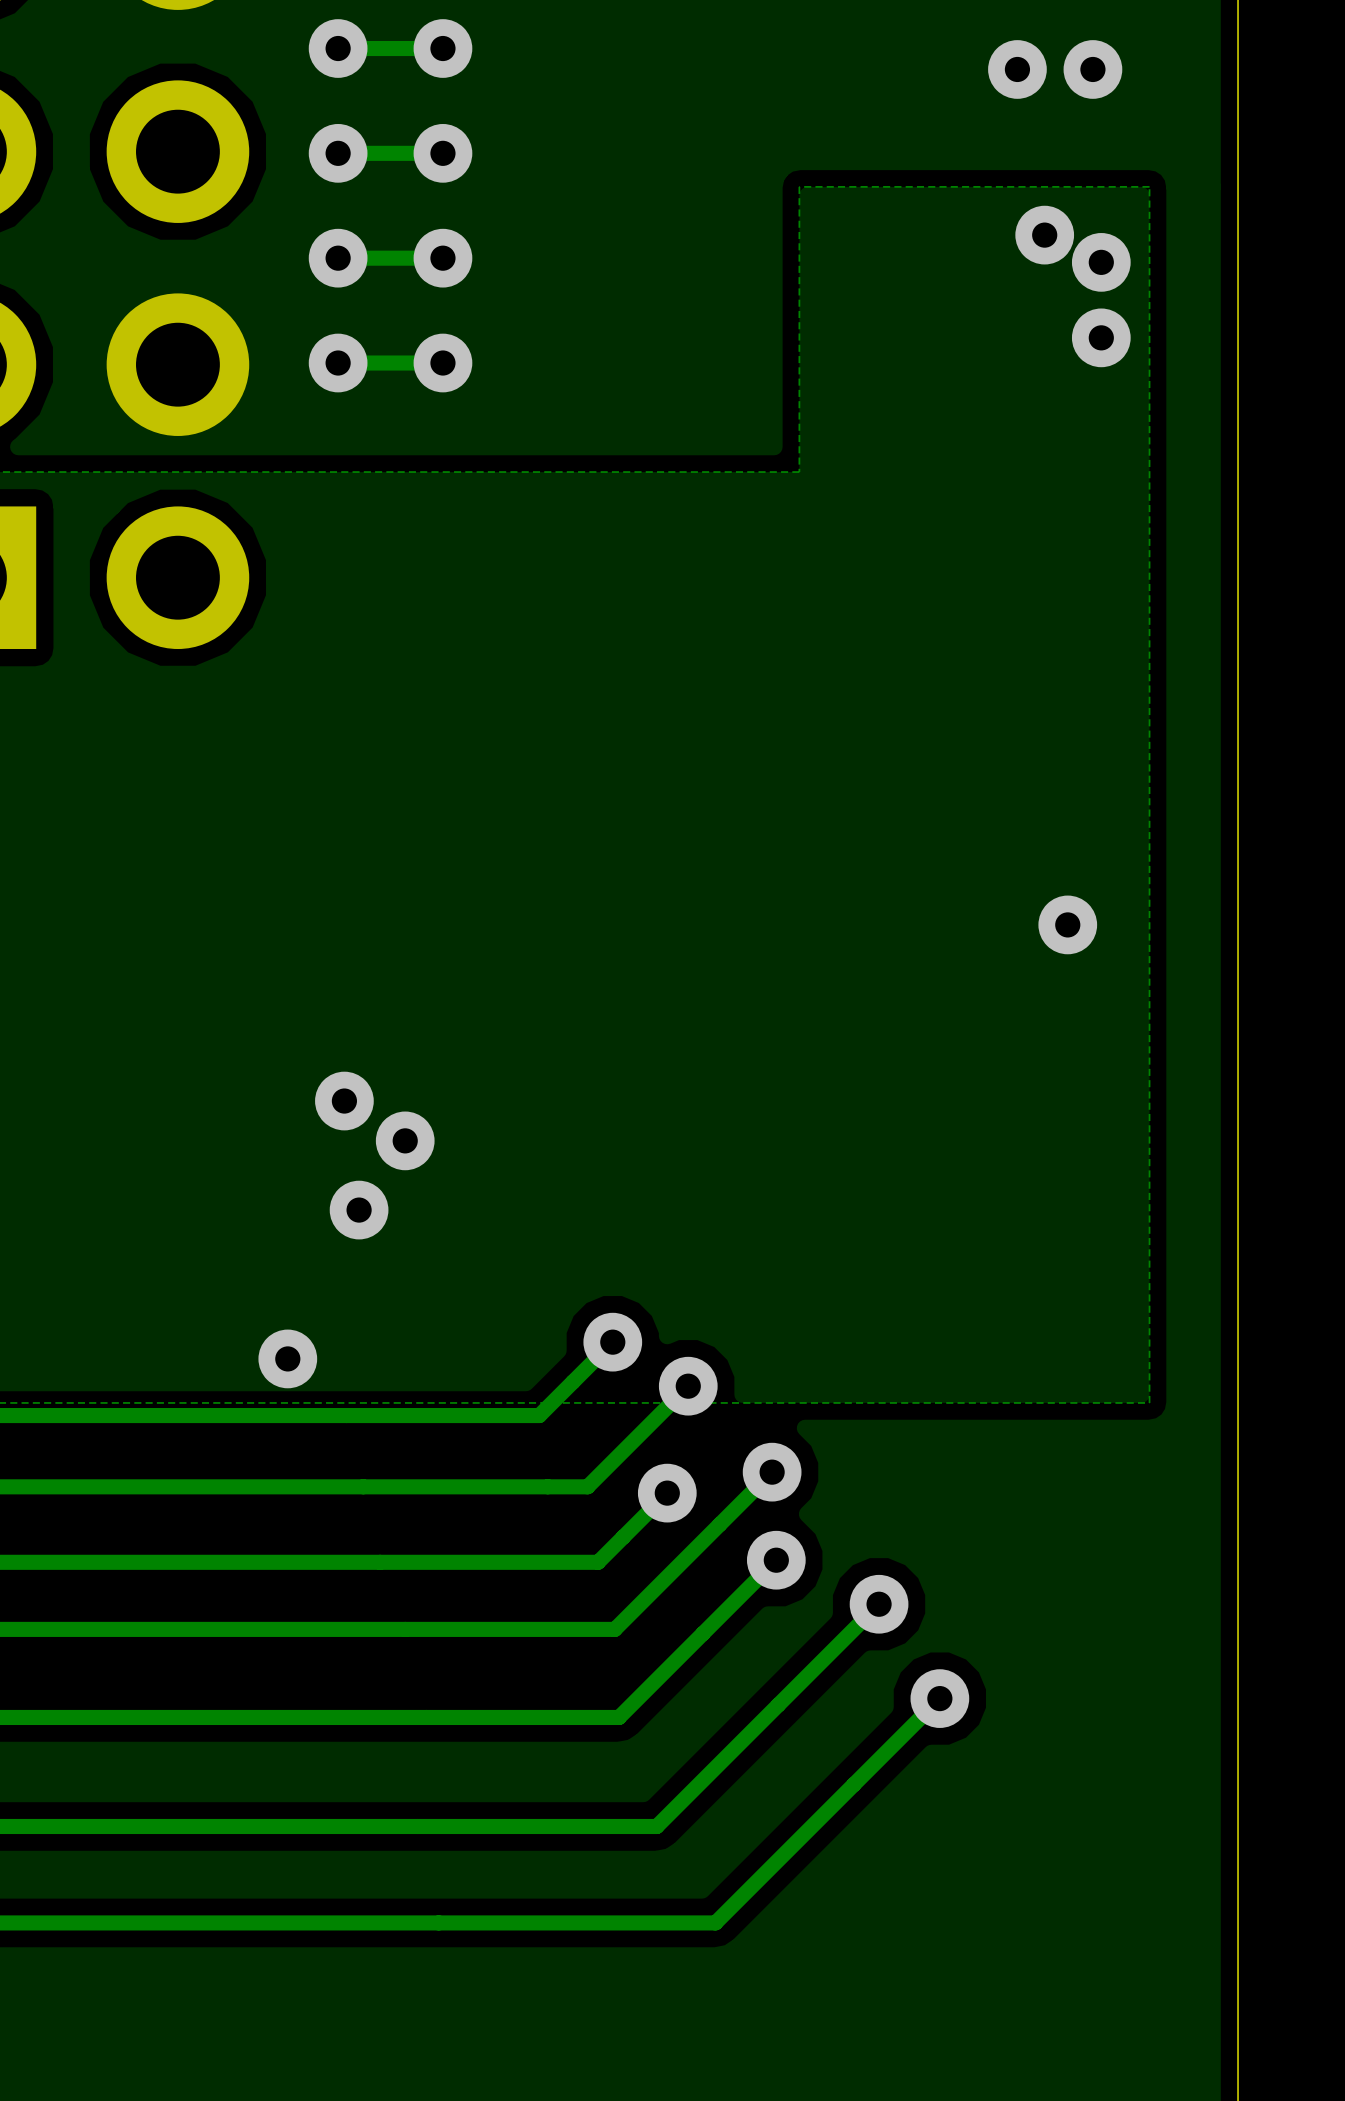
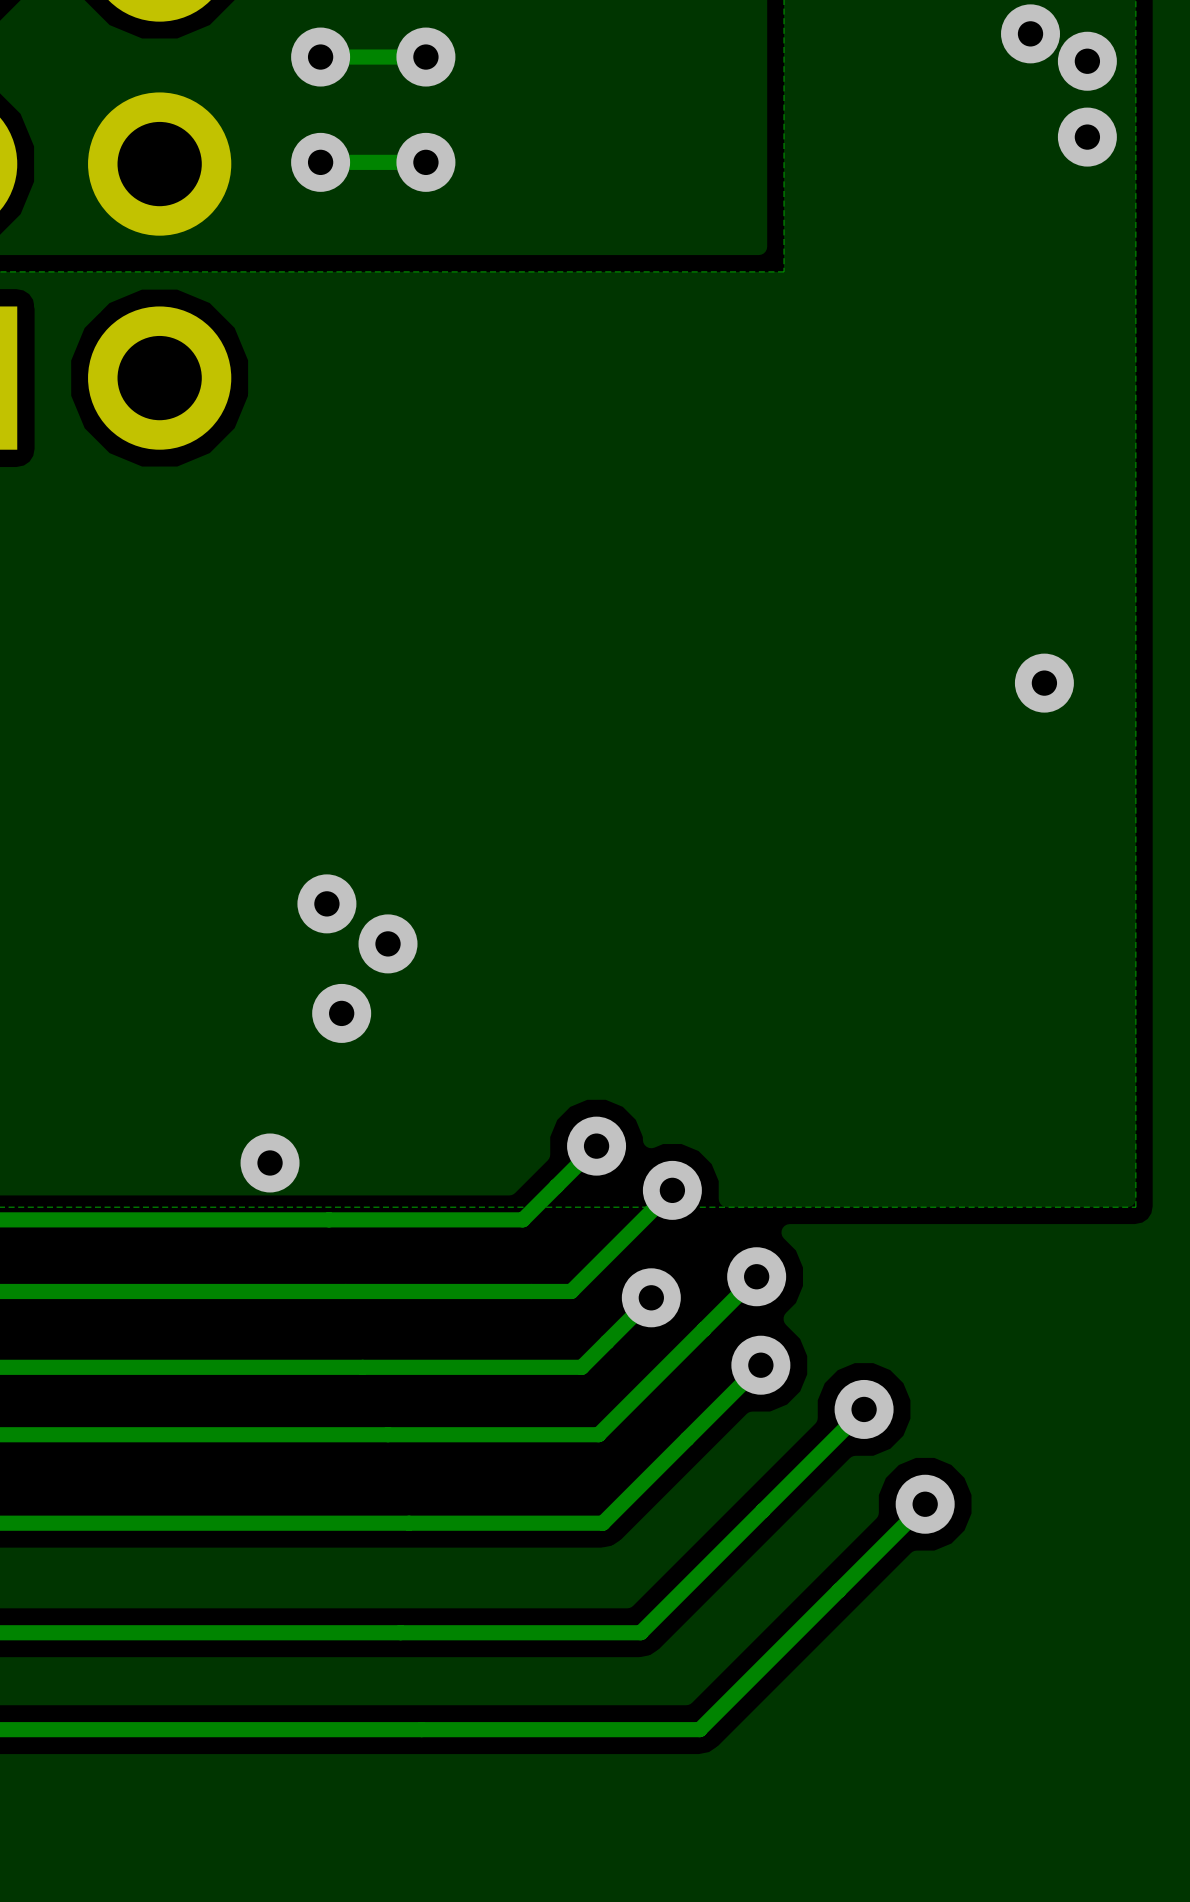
via position: (1067, 924) -> (1044, 683)

